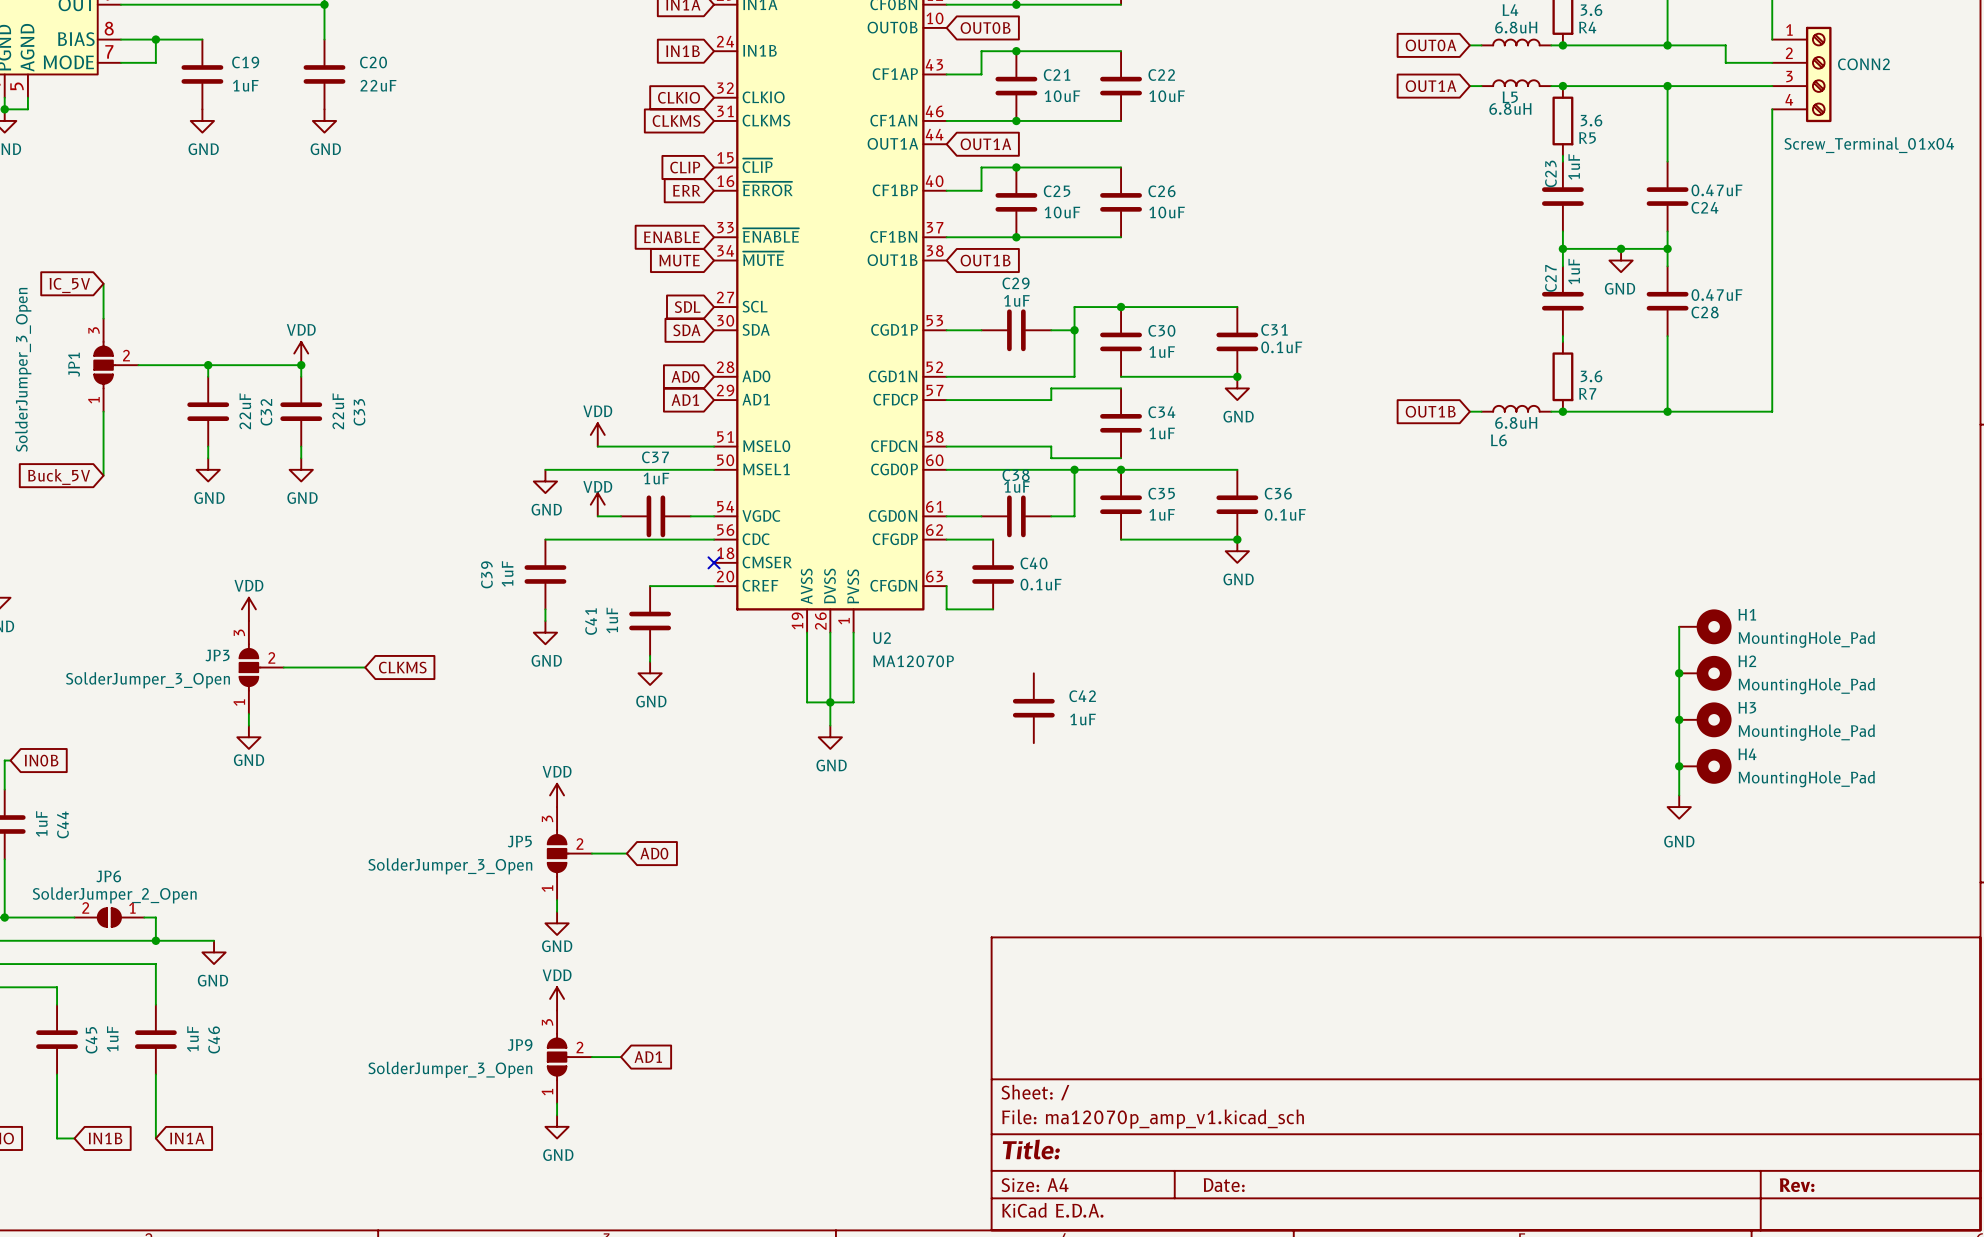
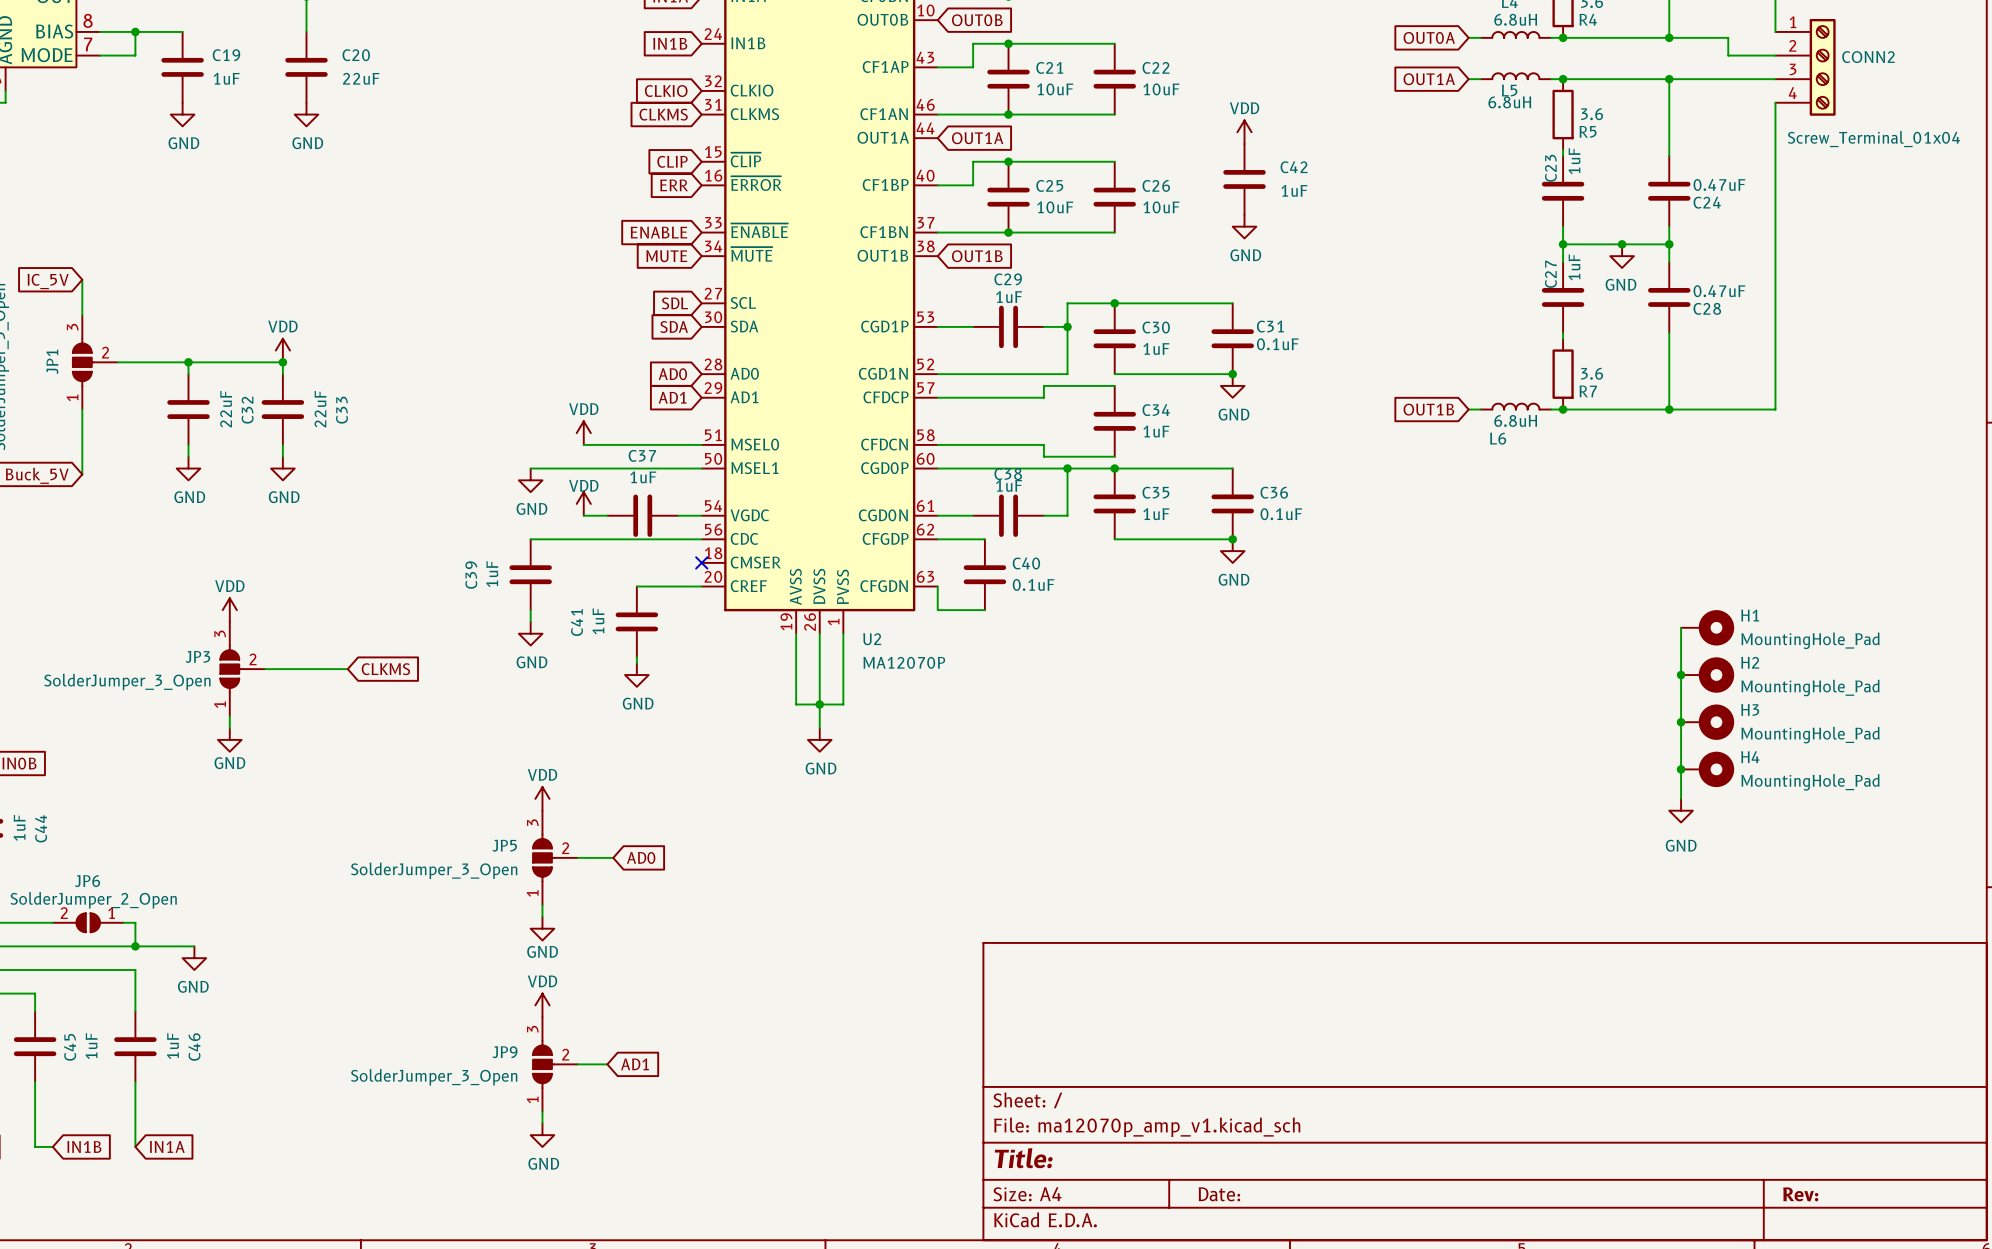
power symbol: none -> VDD (1244, 132)
power symbol: none -> GND (1244, 226)
C42 position: (1033, 708) -> (1244, 179)

